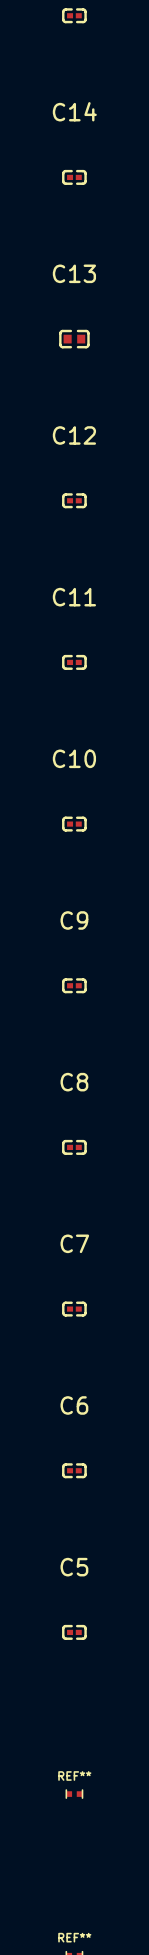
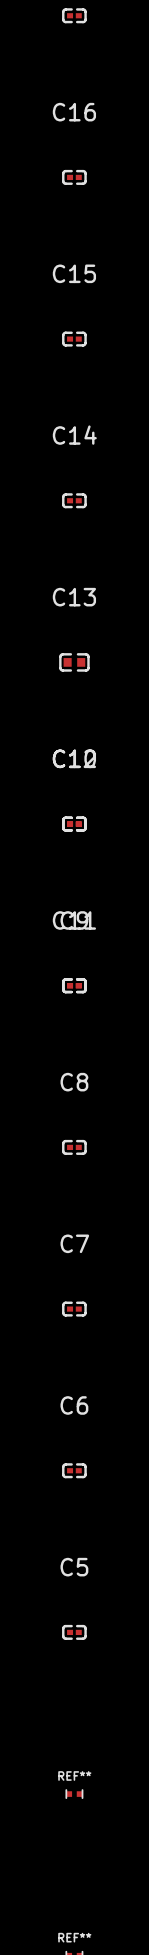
C14 name: C14 (74, 111) -> C16 (74, 112)
C13 position: (74, 339) -> (74, 662)
C15: none -> (74, 339)
C12 name: C12 (74, 435) -> C14 (74, 435)
C11 position: (74, 662) -> (74, 985)
part: none -> (74, 824)

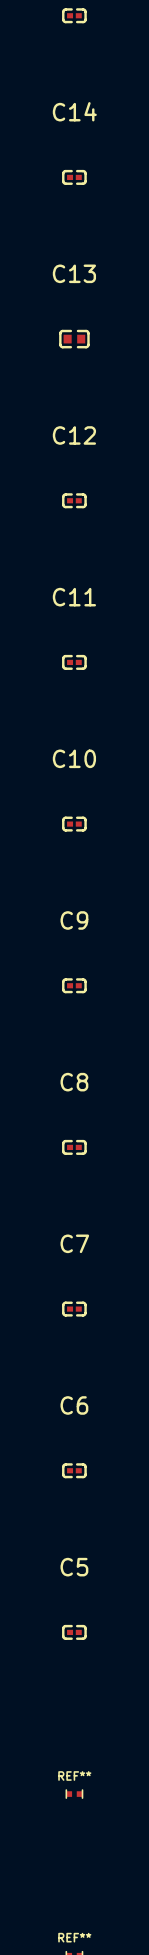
C16 name: C16 (74, 112) -> C14 (74, 111)
C15: (74, 339) -> none
C14 name: C14 (74, 435) -> C12 (74, 435)
C13 position: (74, 662) -> (74, 339)
part: (74, 824) -> none
C11 position: (74, 985) -> (74, 662)

